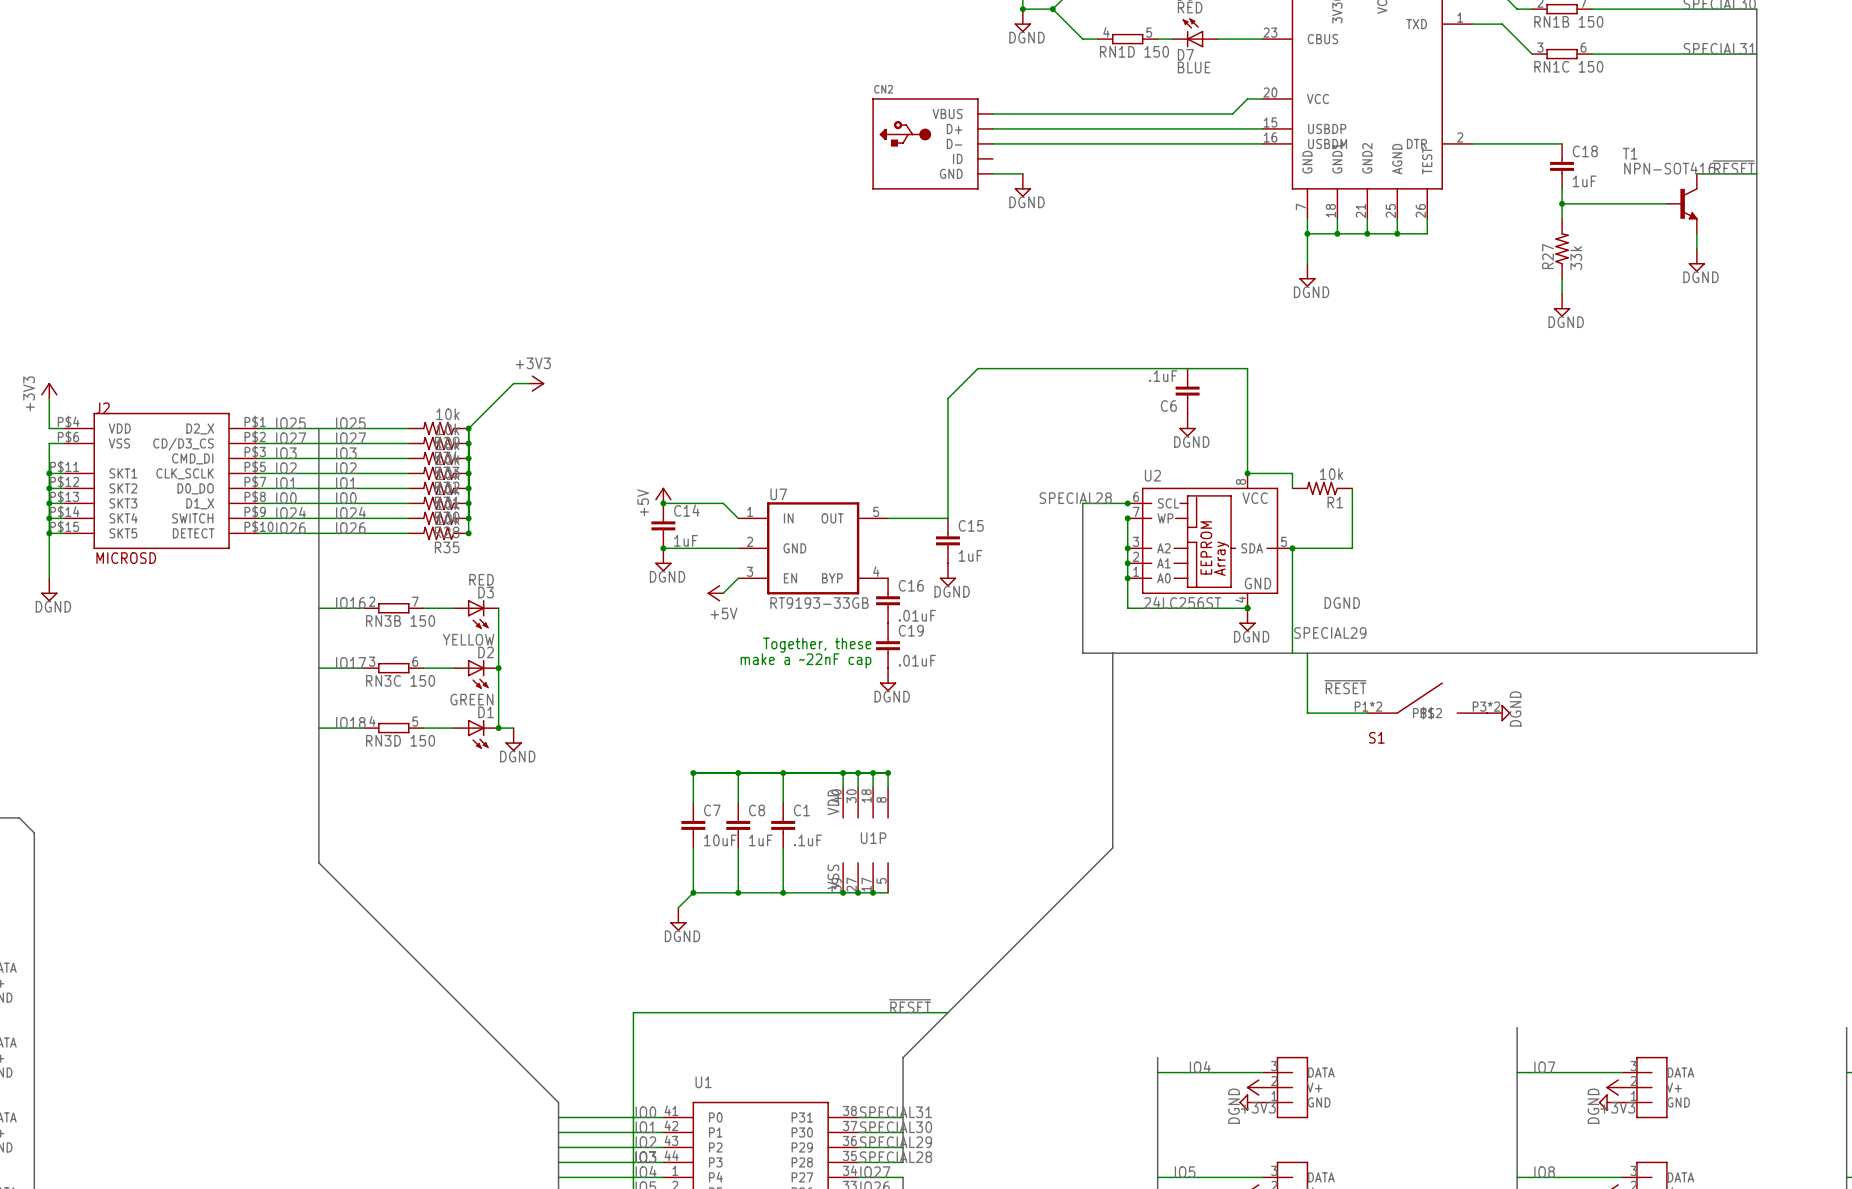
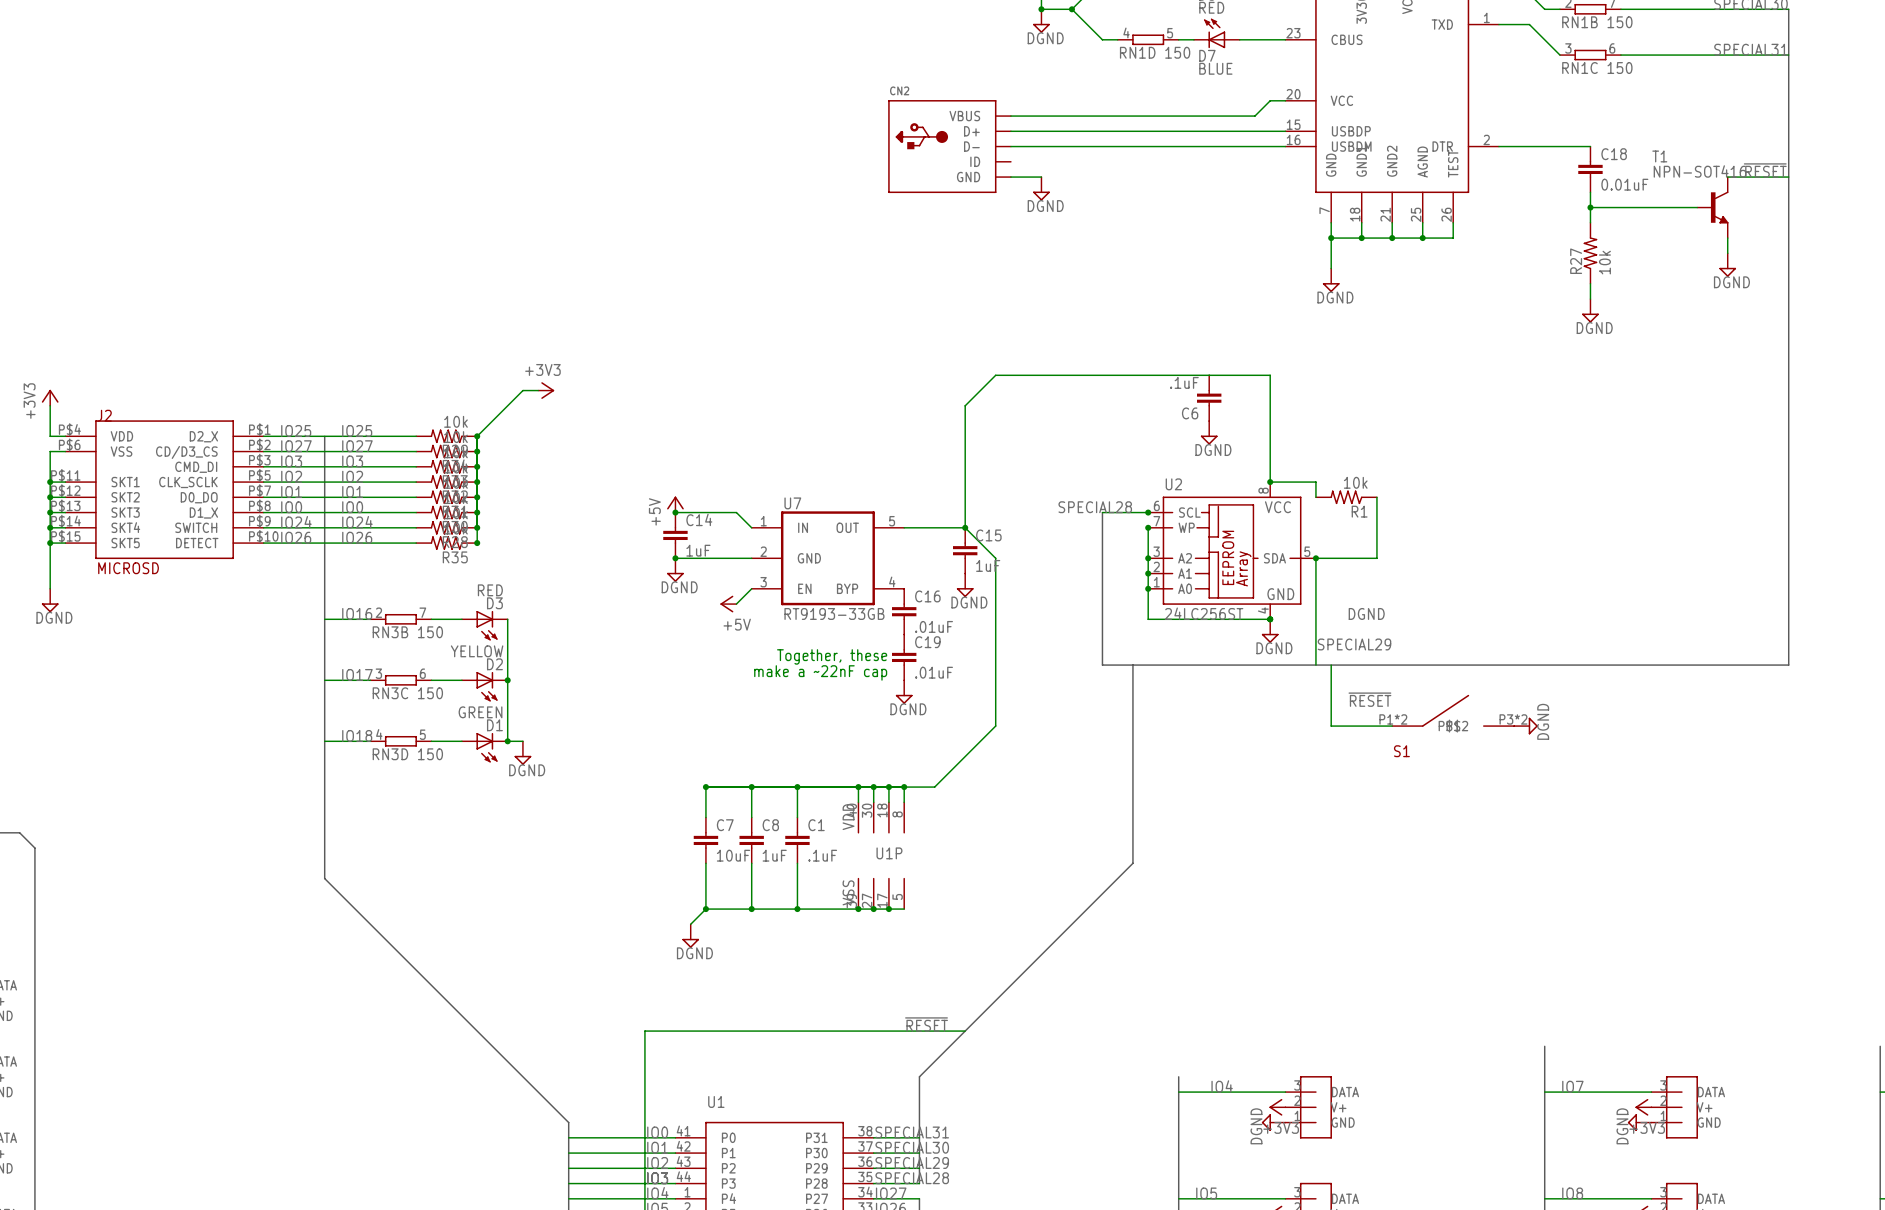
C18 value: 1uF (1584, 181) -> 0.01uF (1624, 184)
R27 value: 33k (1576, 258) -> 10k (1604, 262)
wire: none -> (965, 527) (995, 558) (995, 726) (934, 787) (904, 787)
junction: none -> (965, 527)

